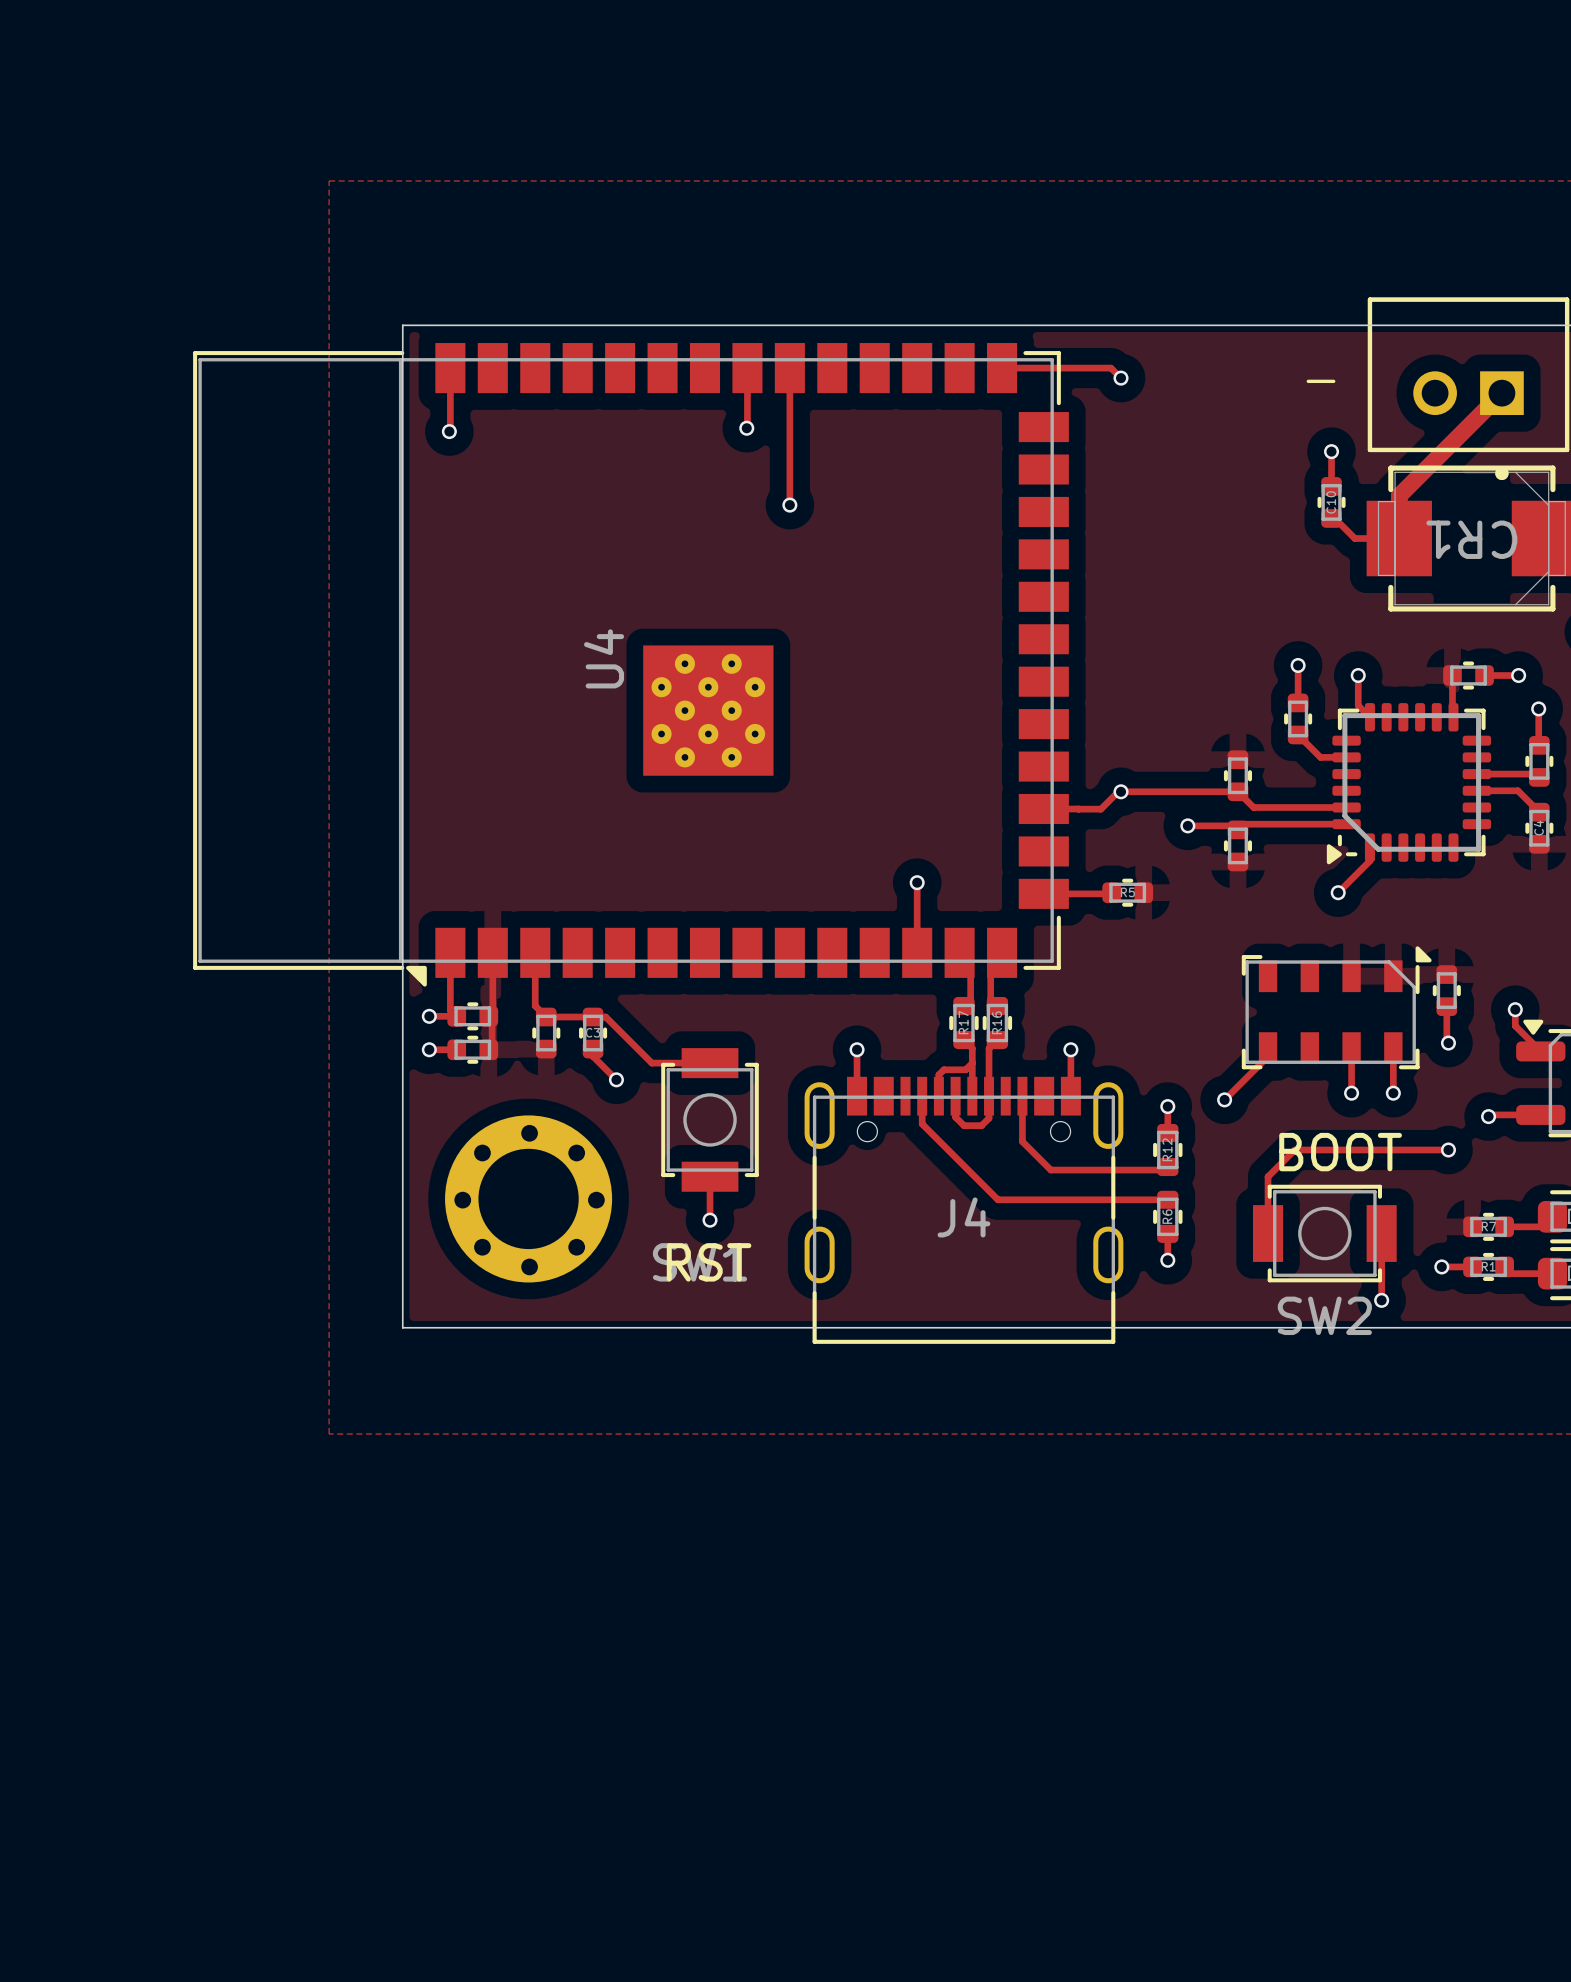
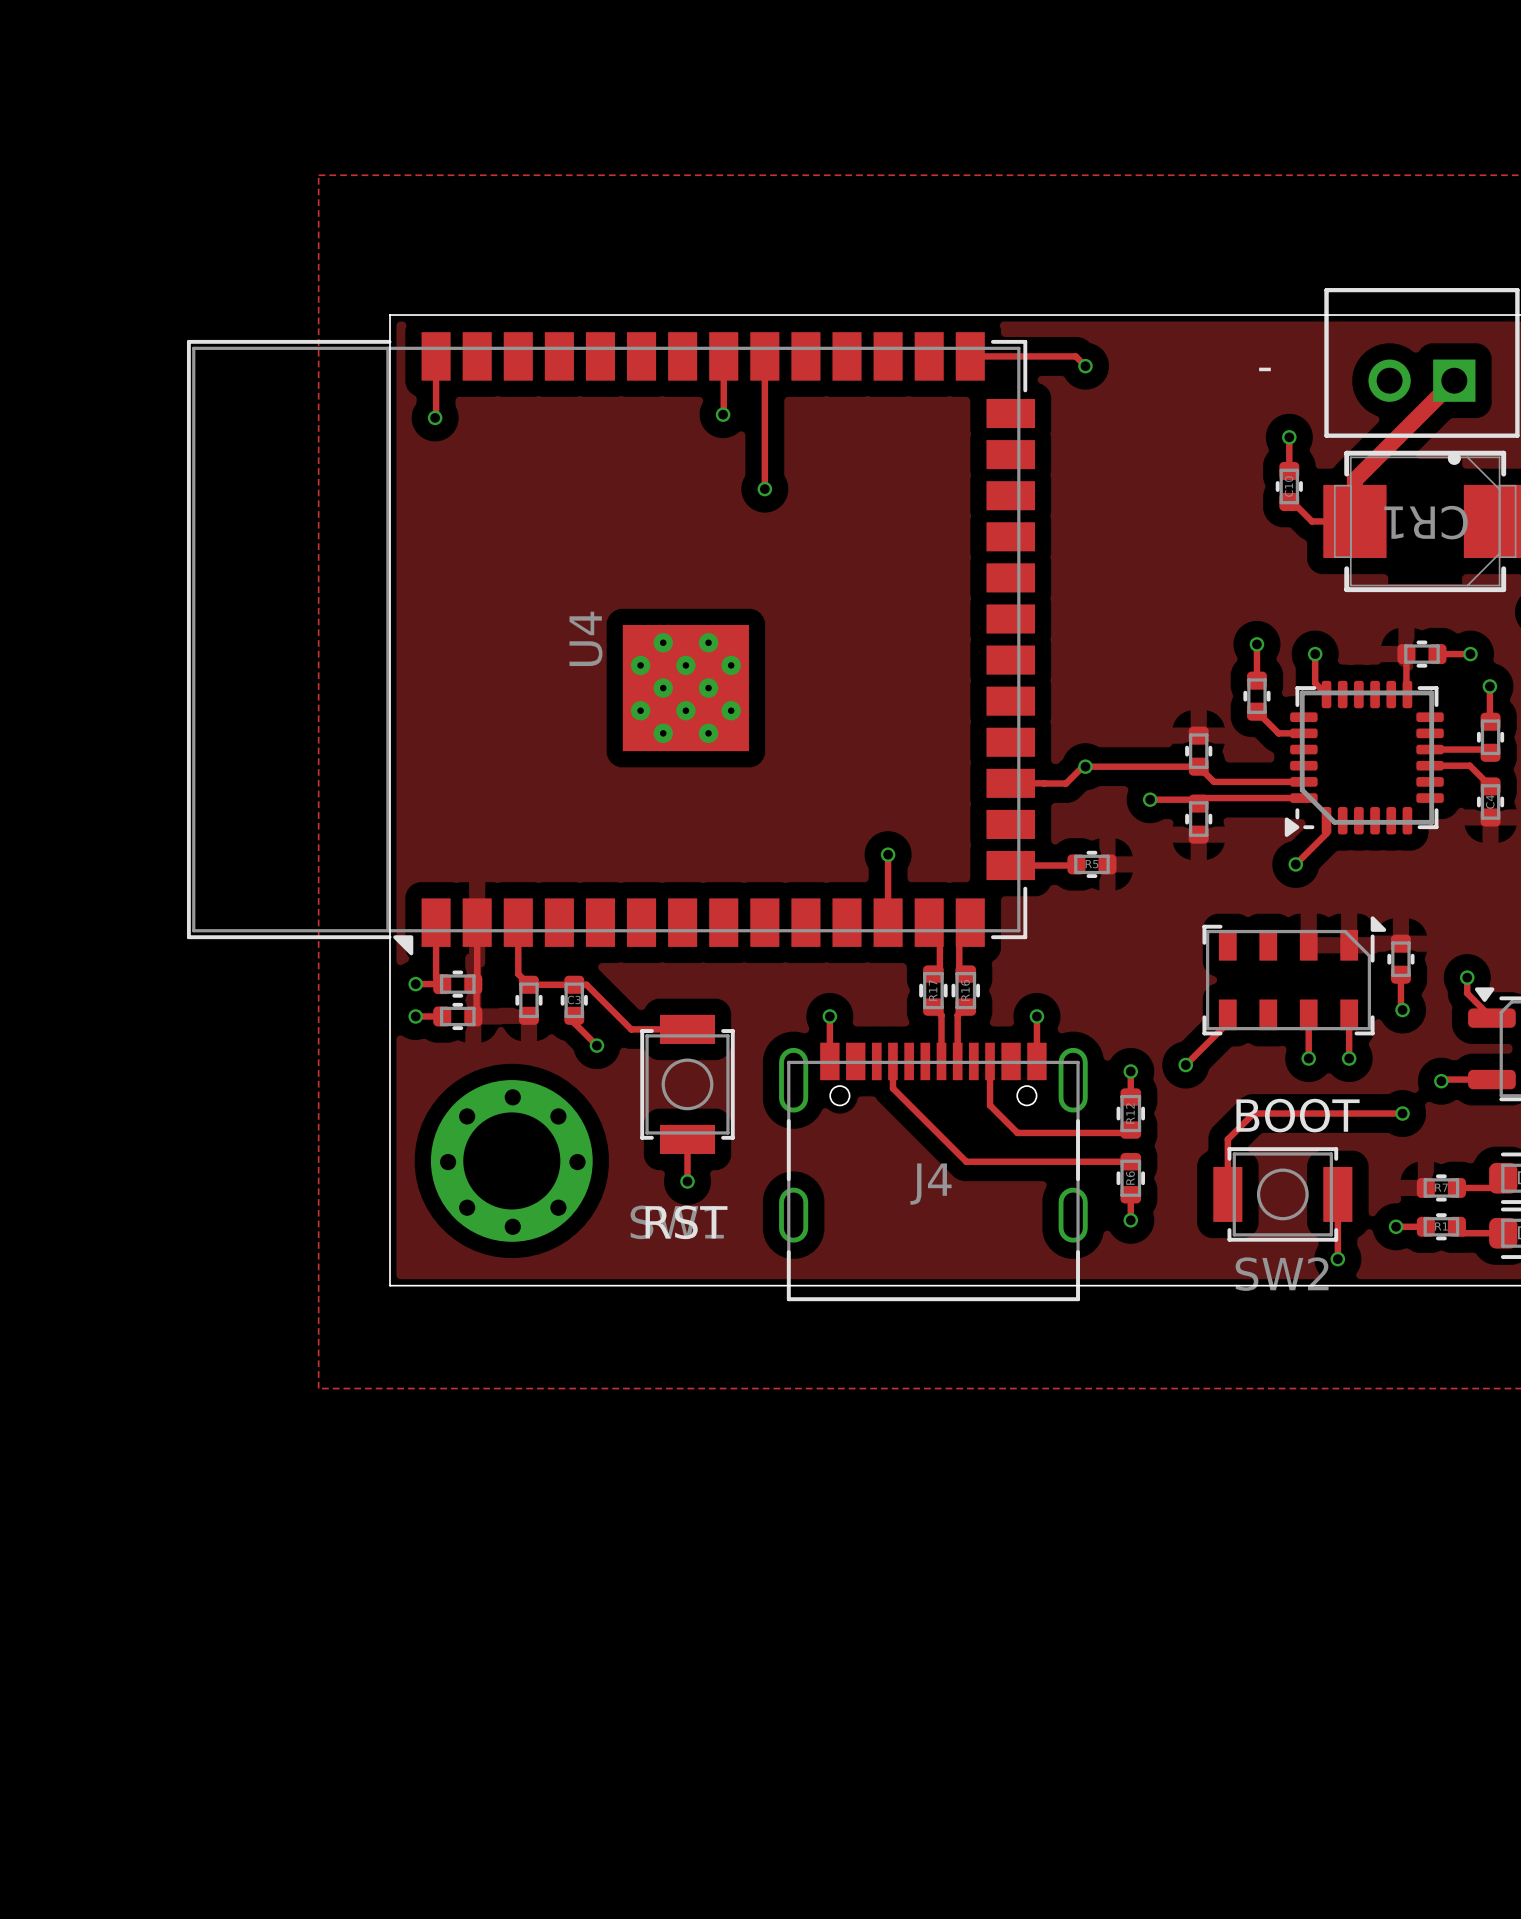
track: (972, 1063) (965, 1069) (943, 1069) (938, 1074) (938, 1096) -> none
track: (955, 1096) (955, 1117) (964, 1125) (981, 1125) (989, 1118) (989, 1096) -> none

